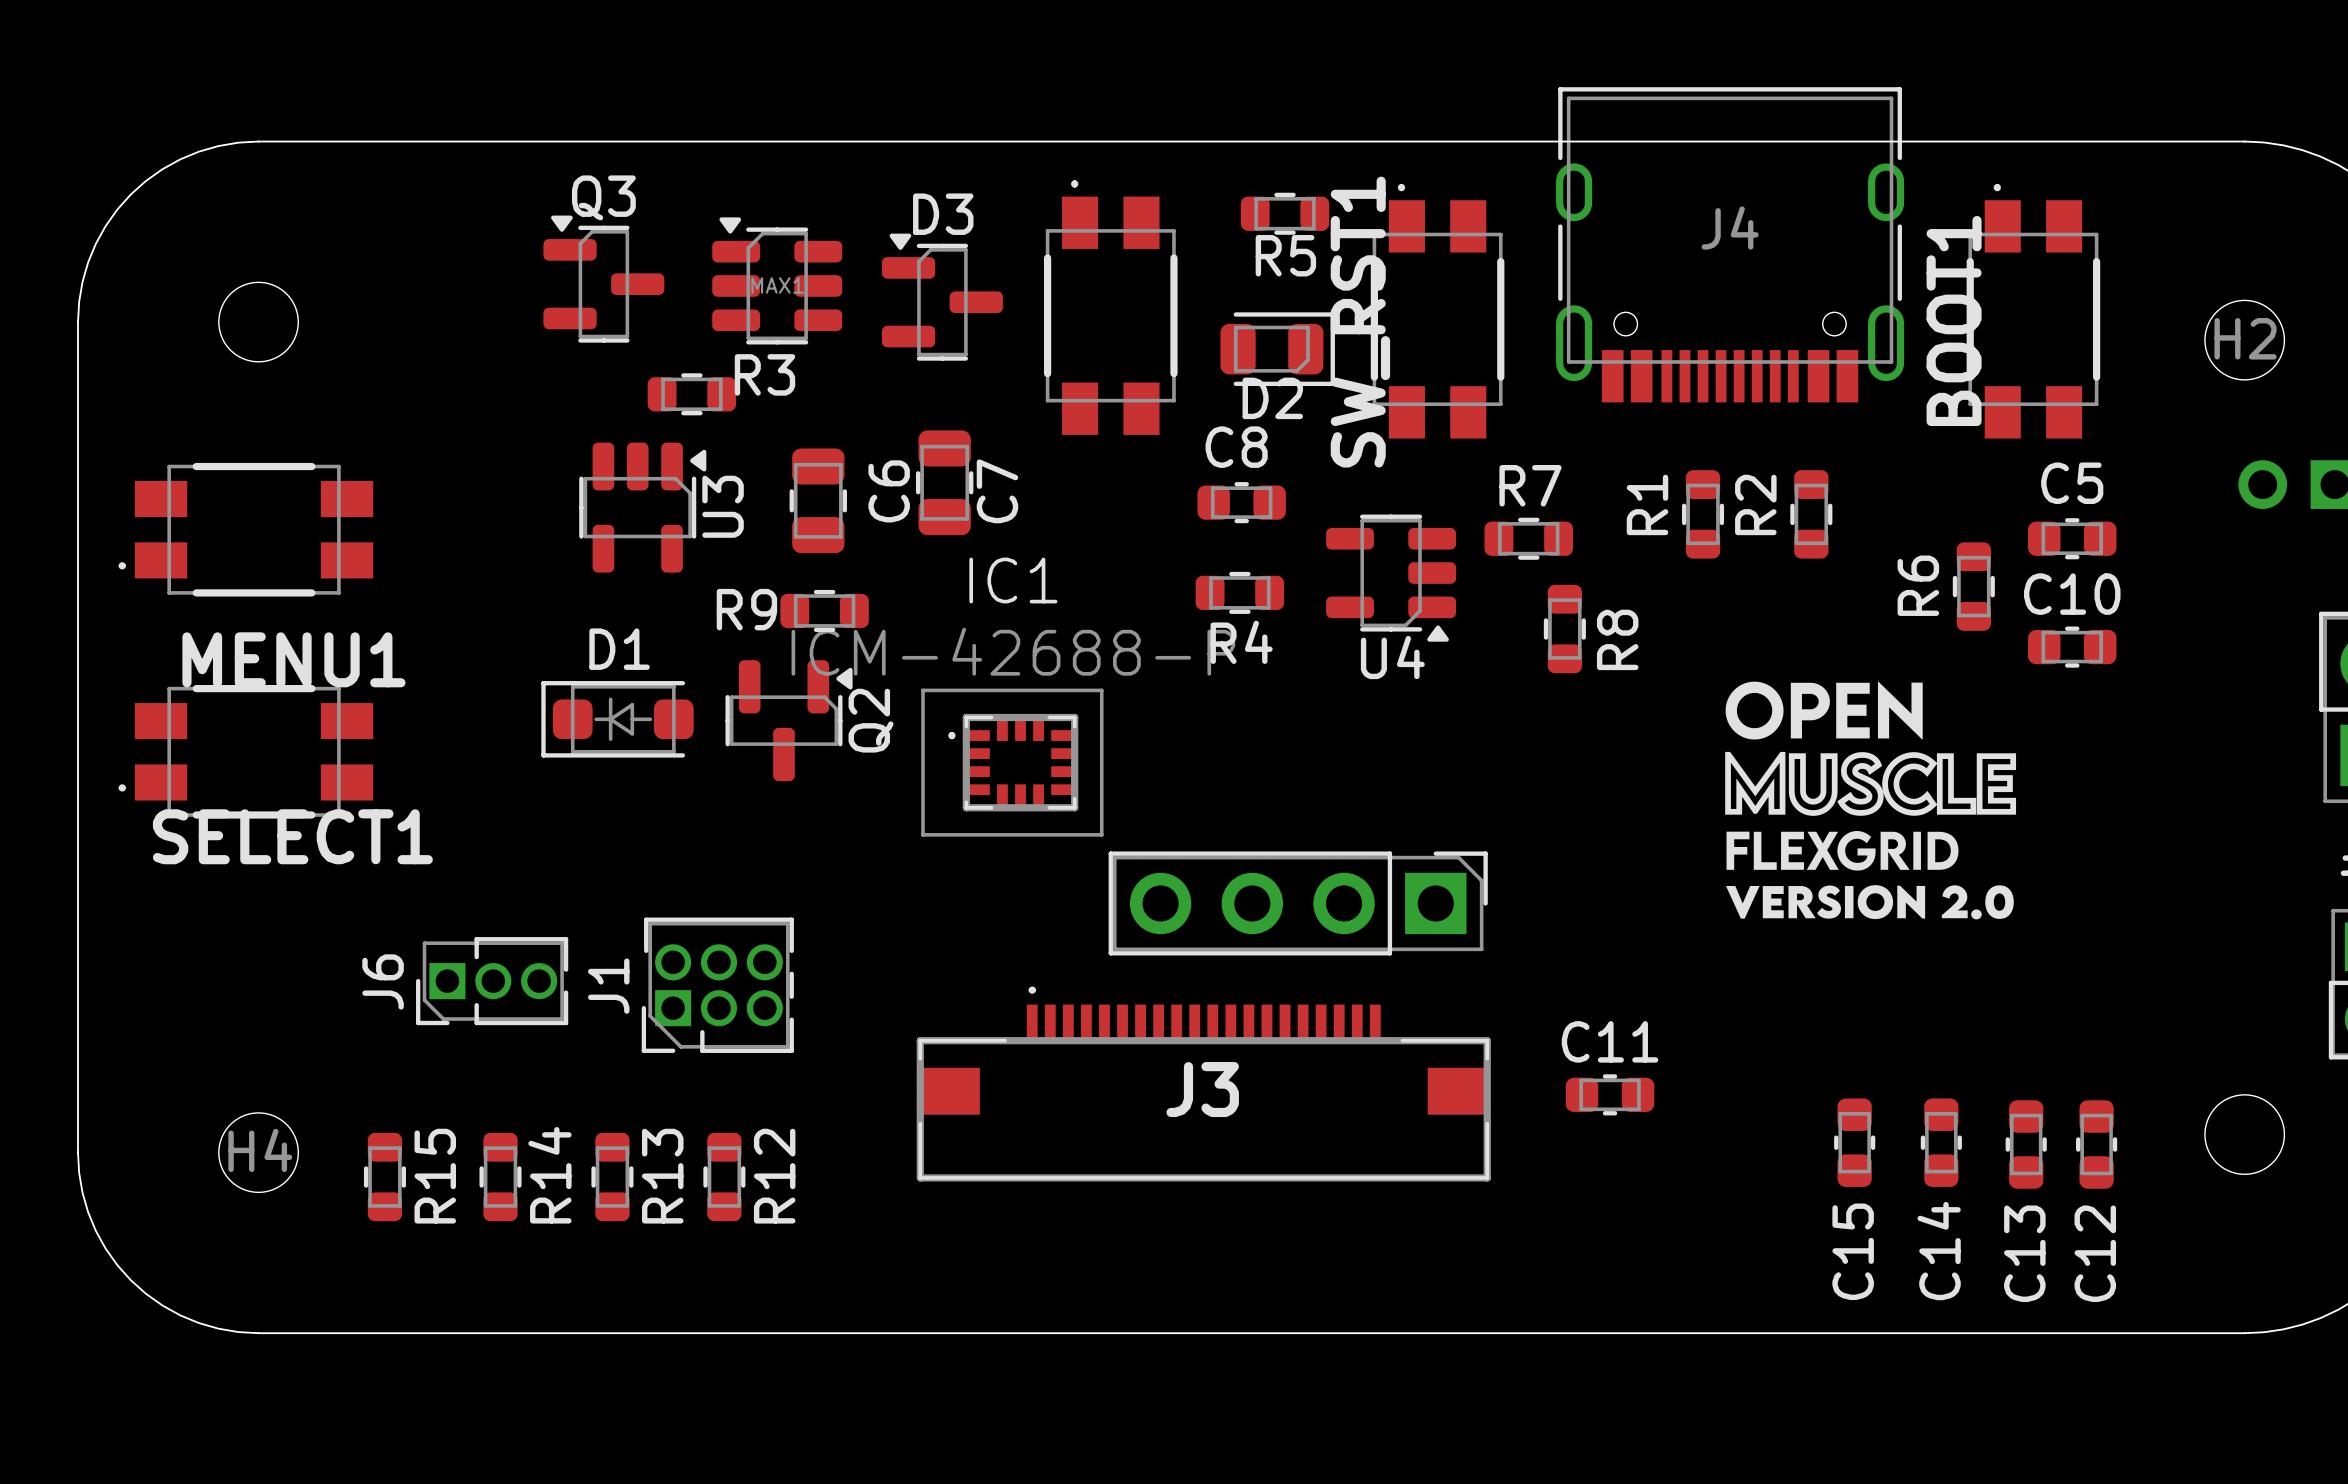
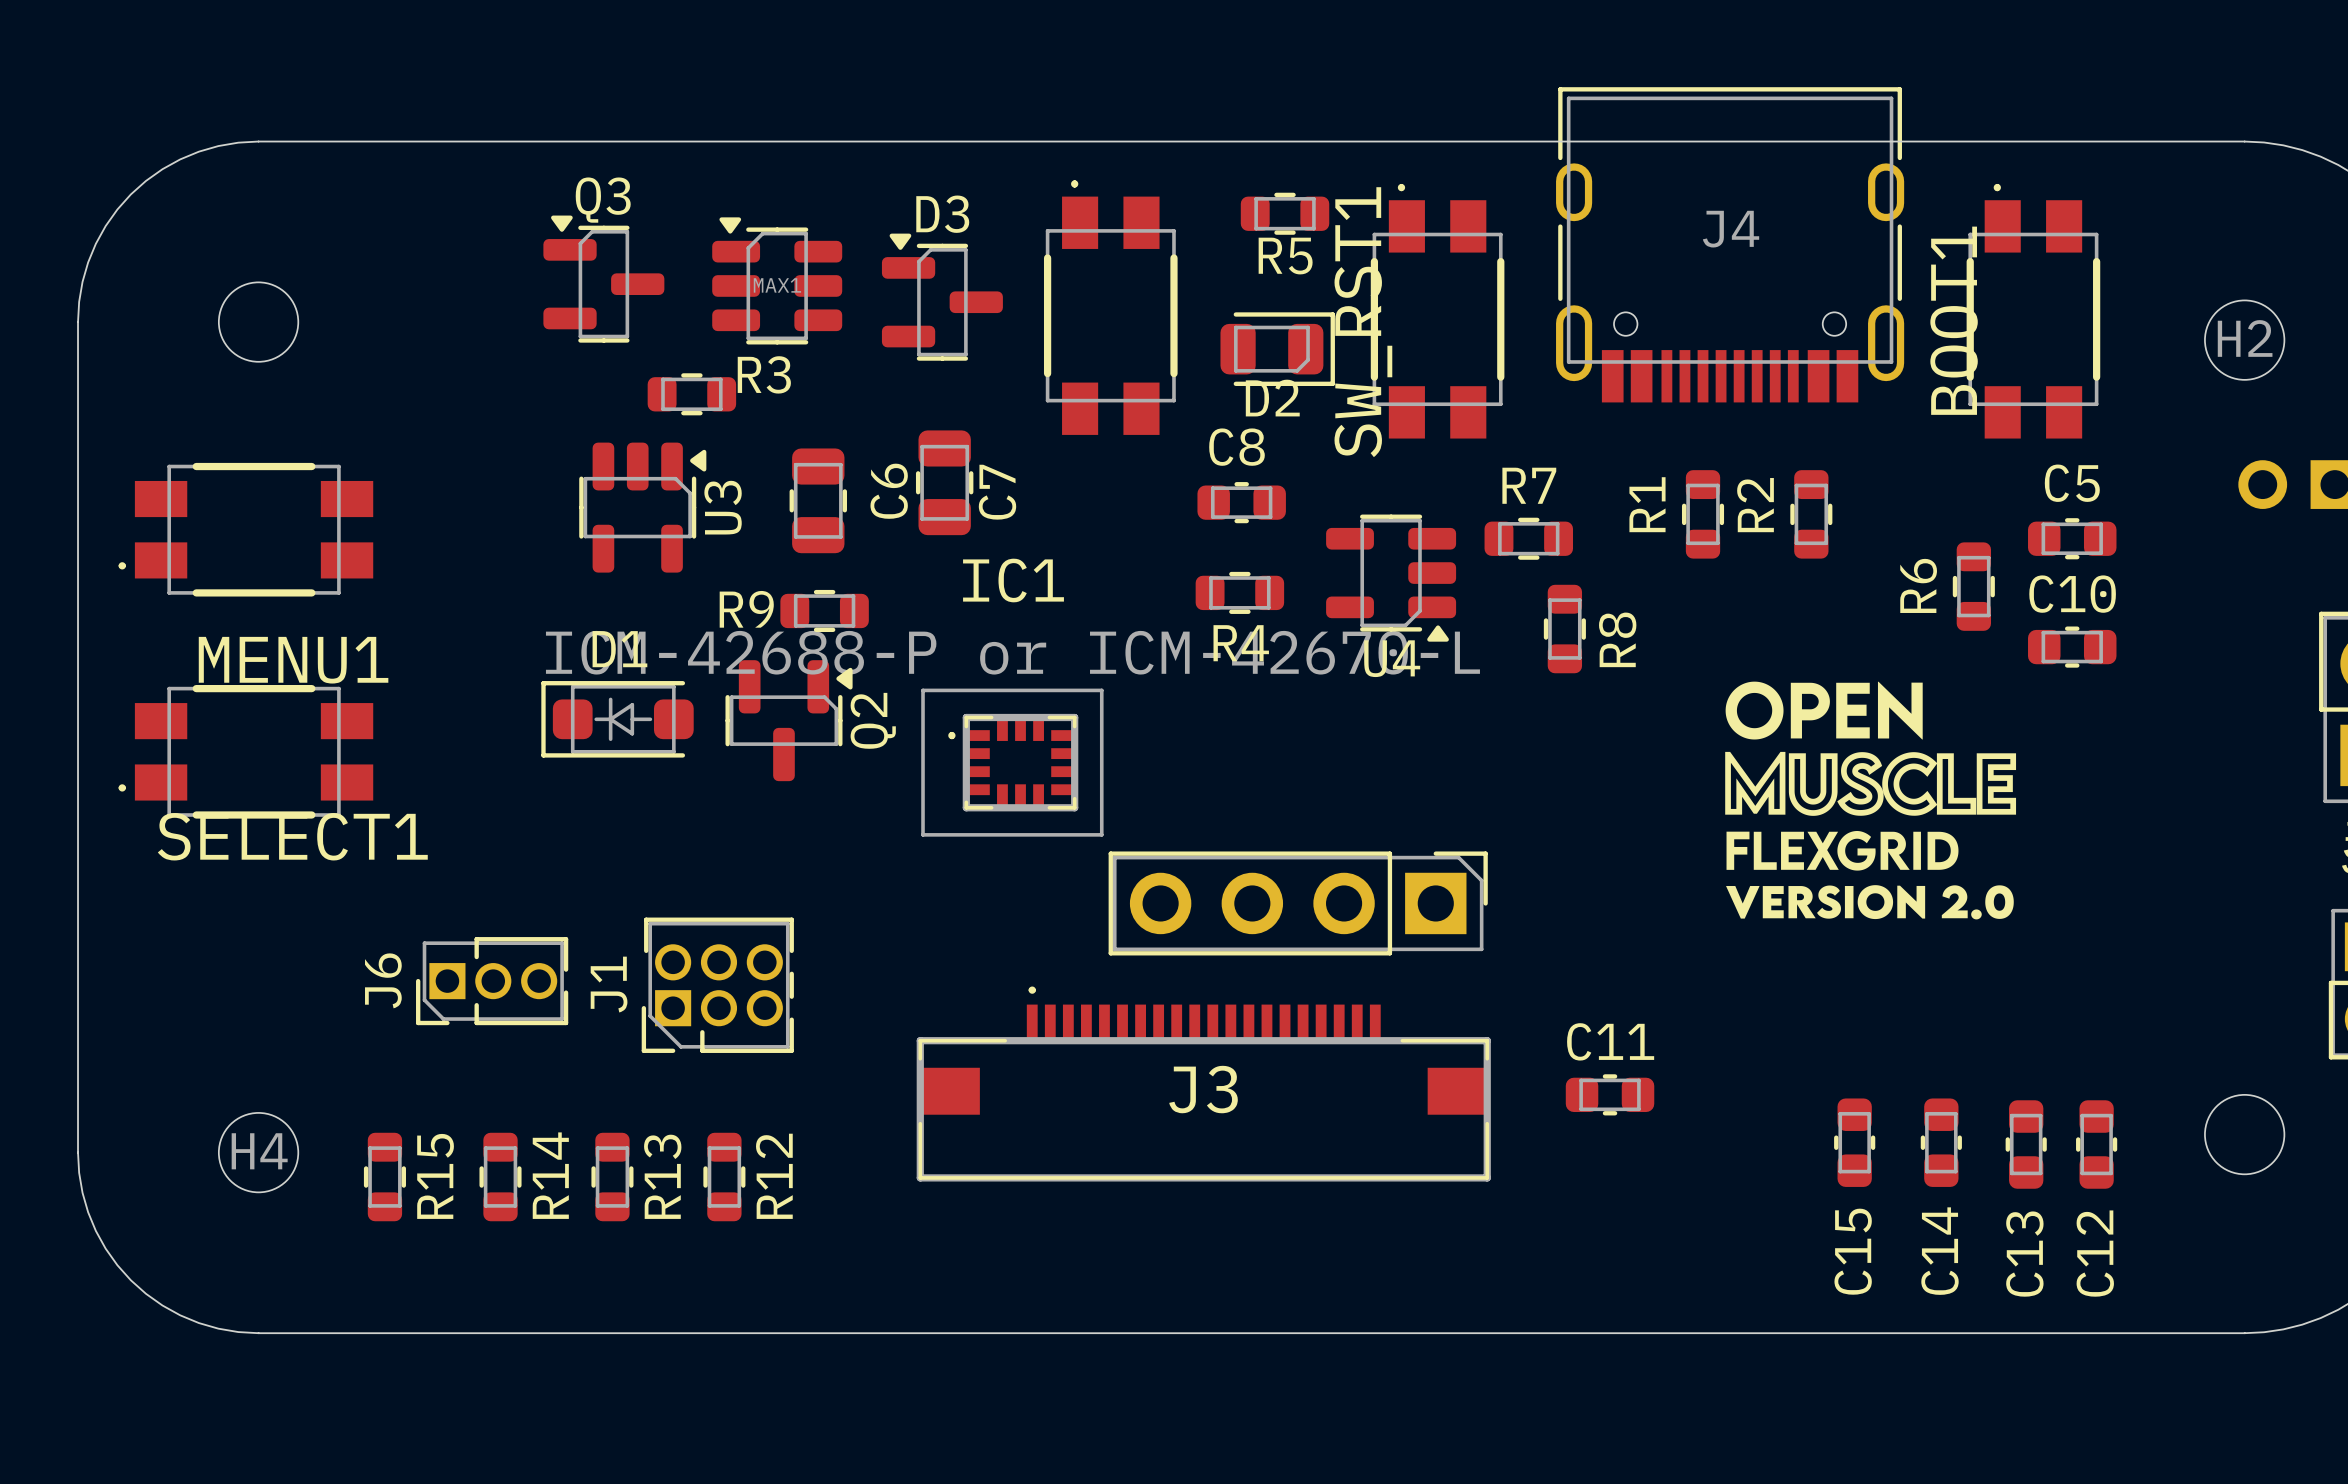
IC1 value: ICM-42688-P (1013, 651) -> ICM-42688-P or ICM-42670-L (1012, 652)

